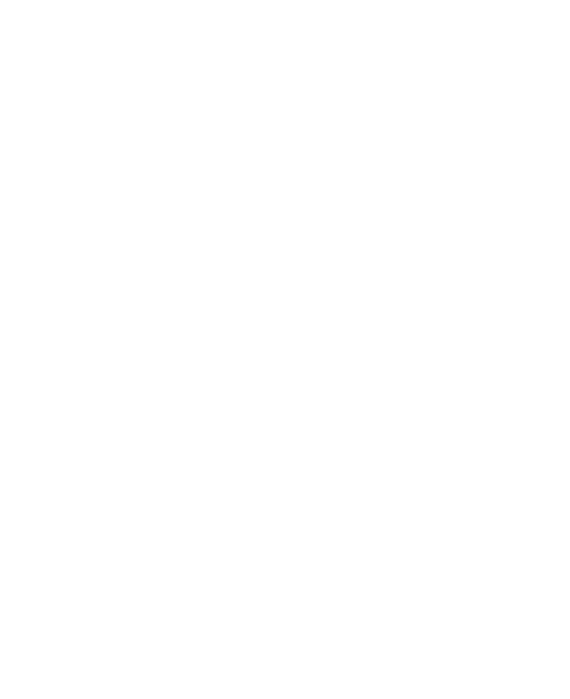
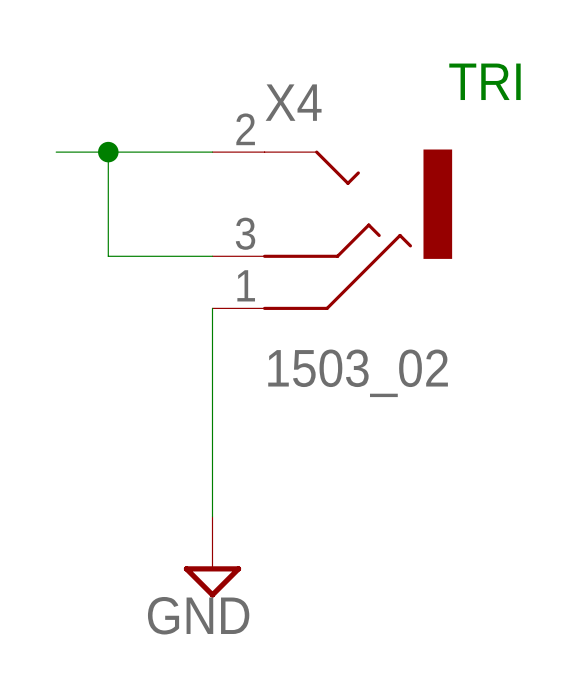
text: none -> TRI (484, 81)
wire: none -> (56, 152) (212, 152)
wire: none -> (108, 152) (108, 256) (212, 256)
junction: none -> (108, 152)
X4: none -> 1503_02 (332, 229)
wire: none -> (212, 308) (212, 516)
power symbol: none -> GND (212, 557)

